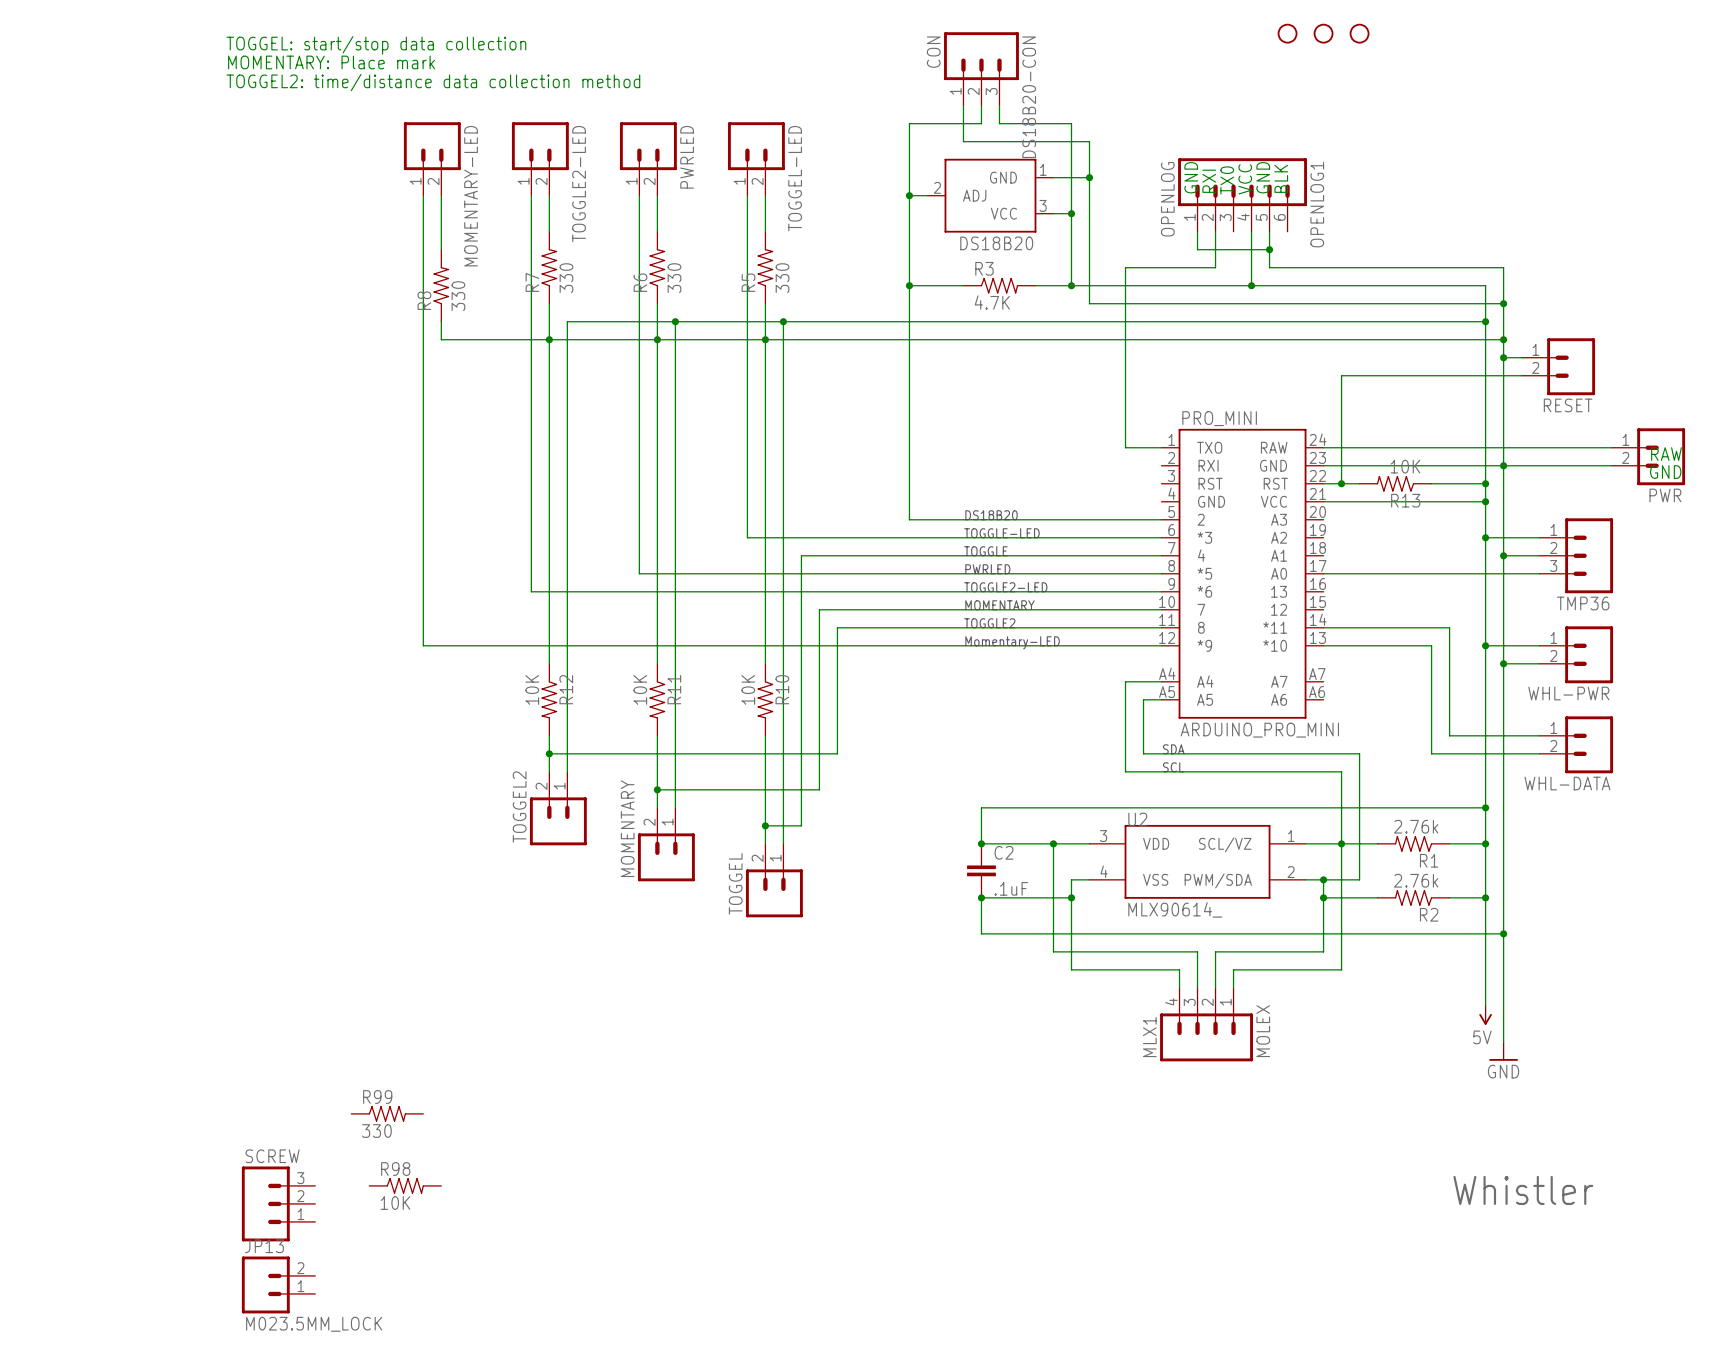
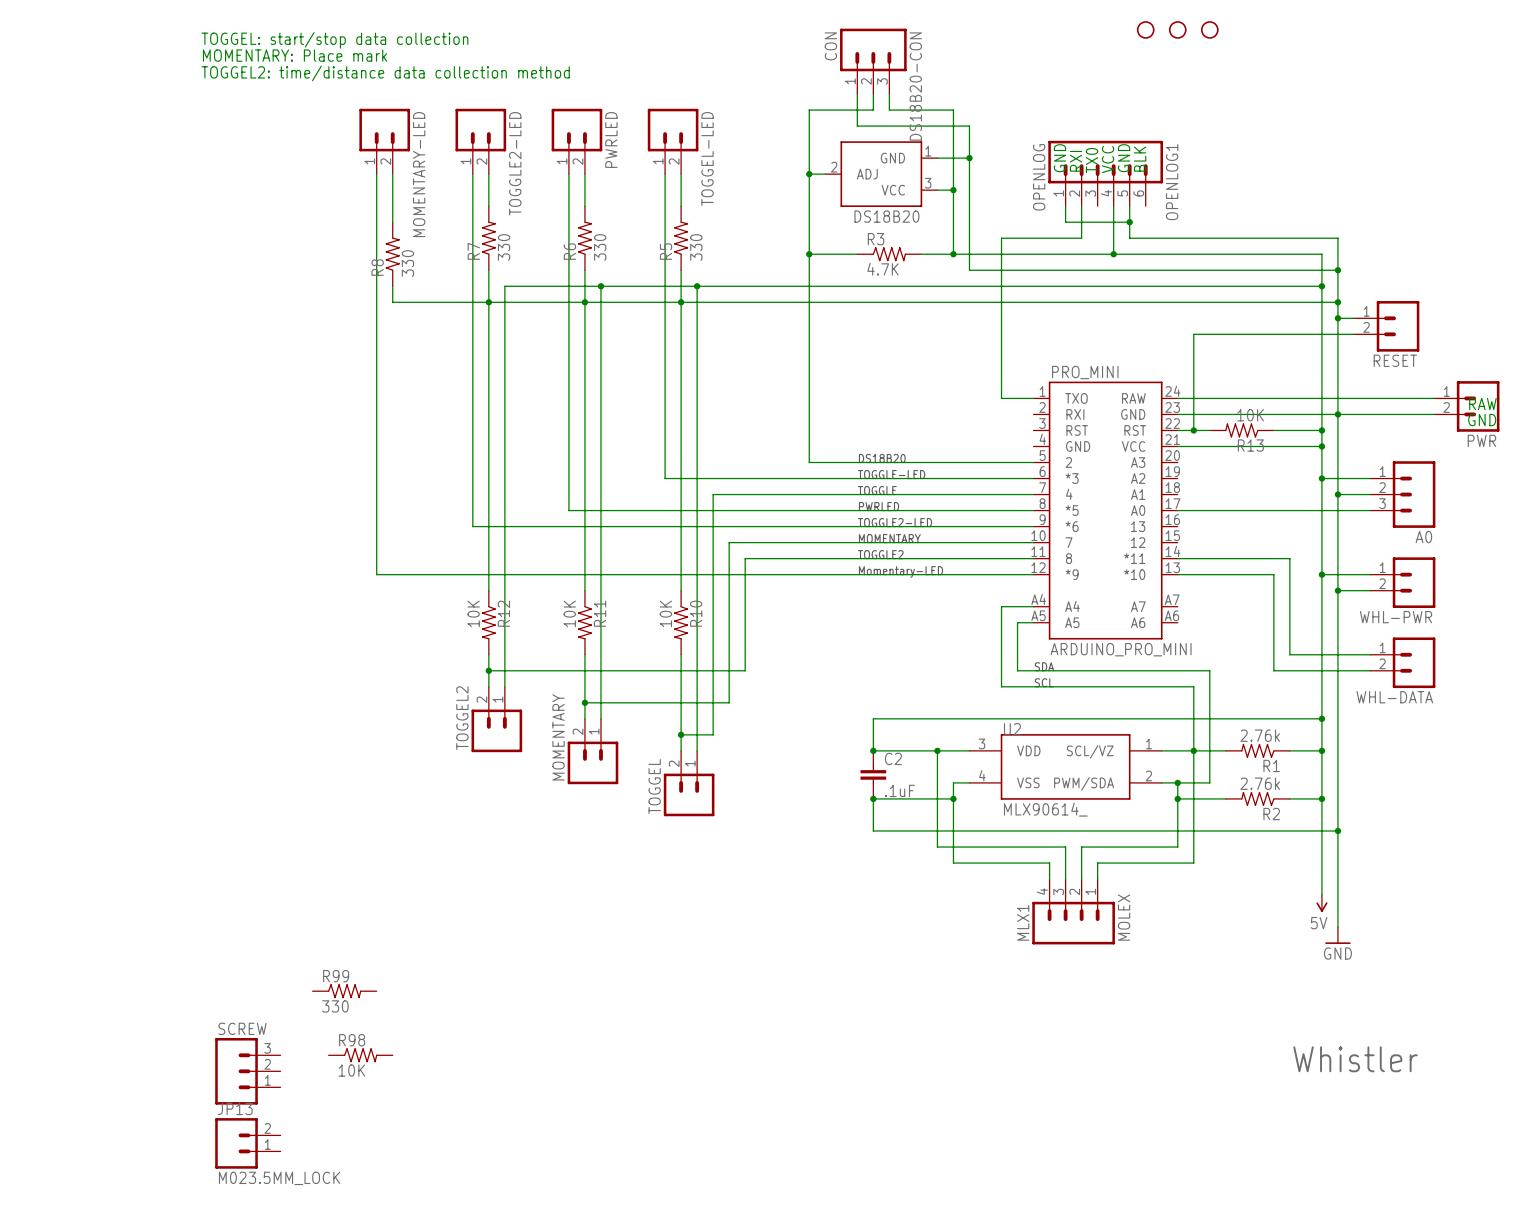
TMP36 name: TMP36 (1583, 603) -> A0 (1423, 537)

